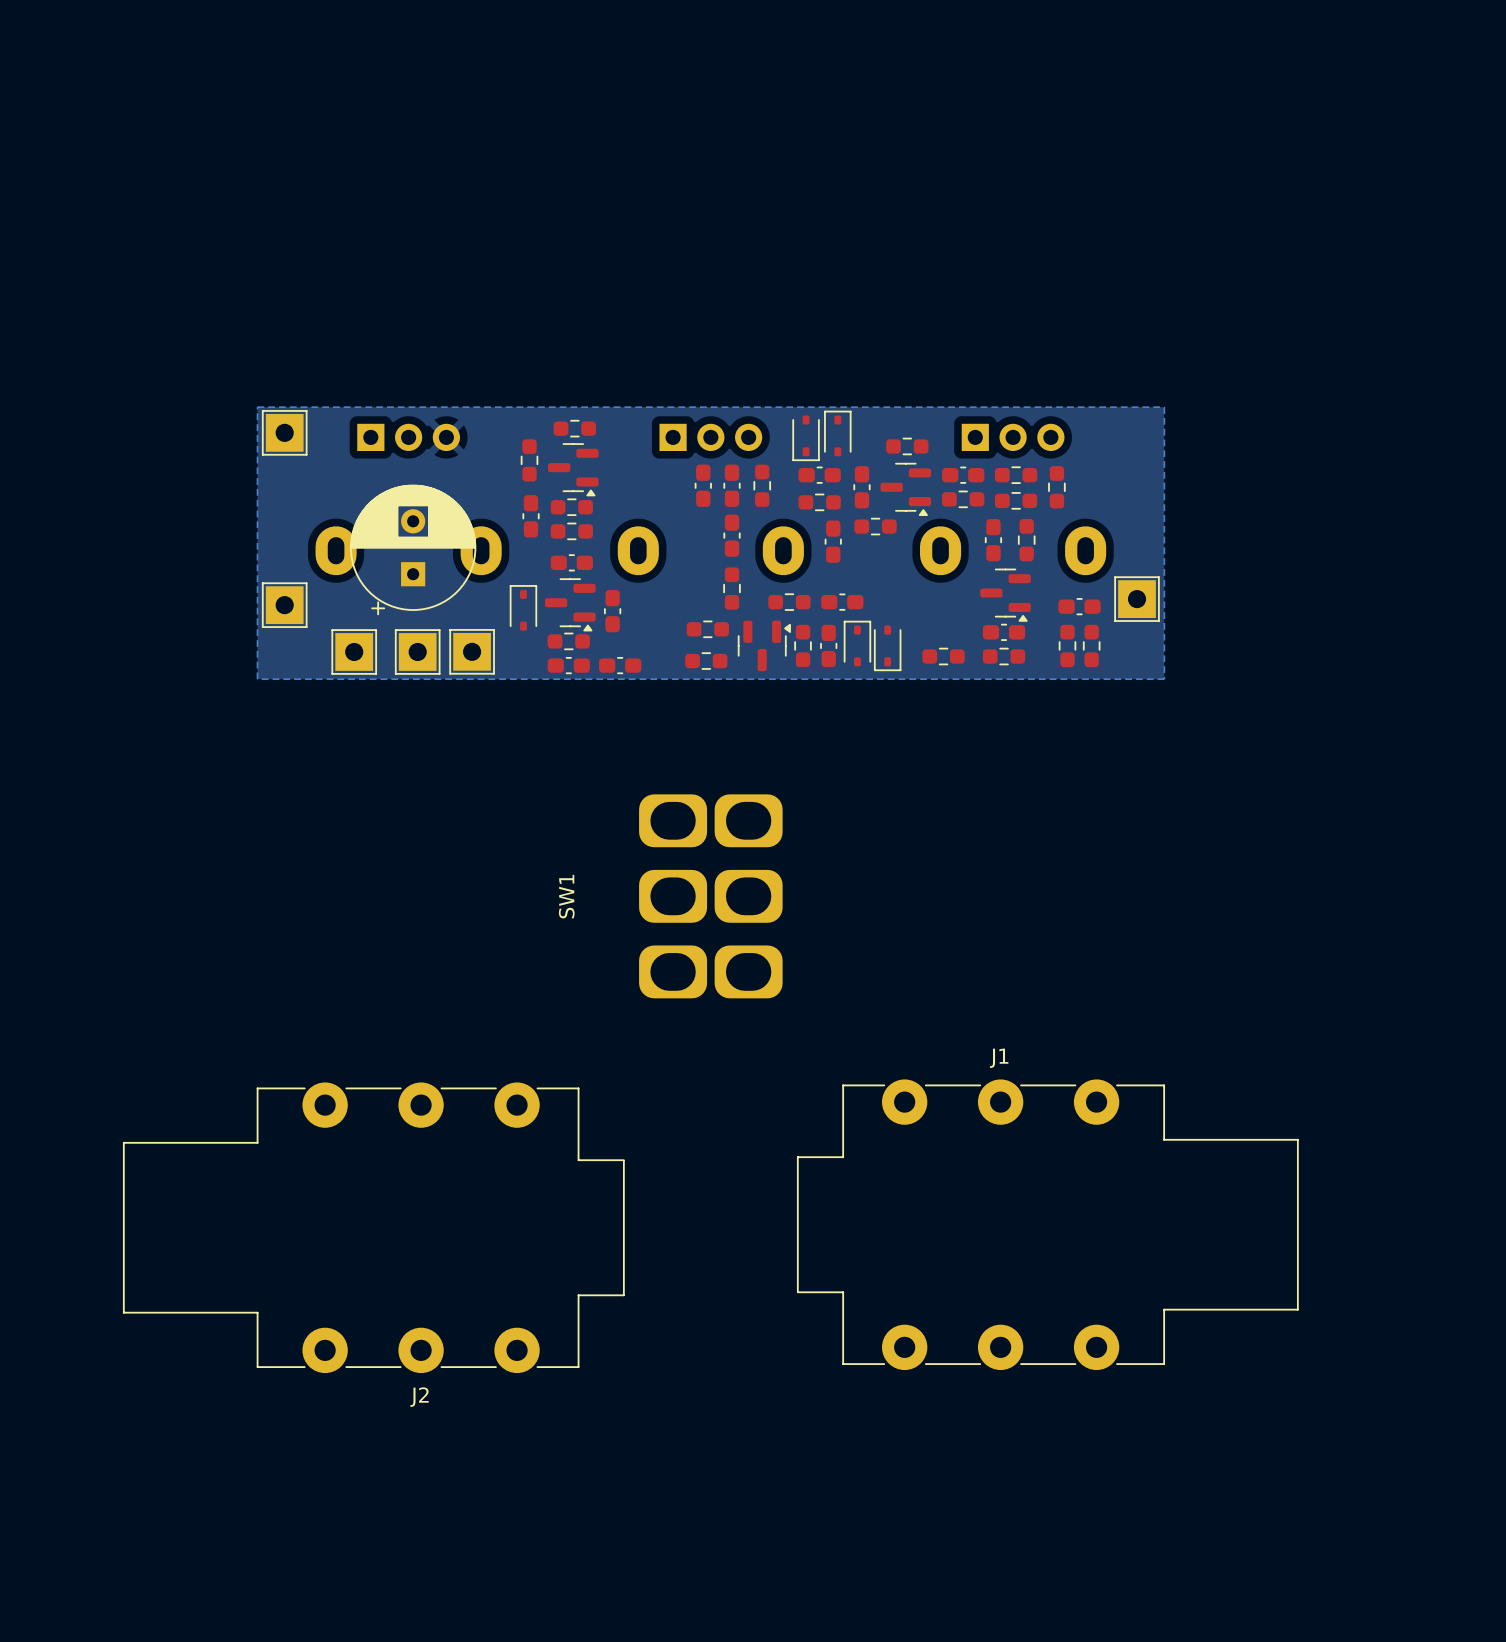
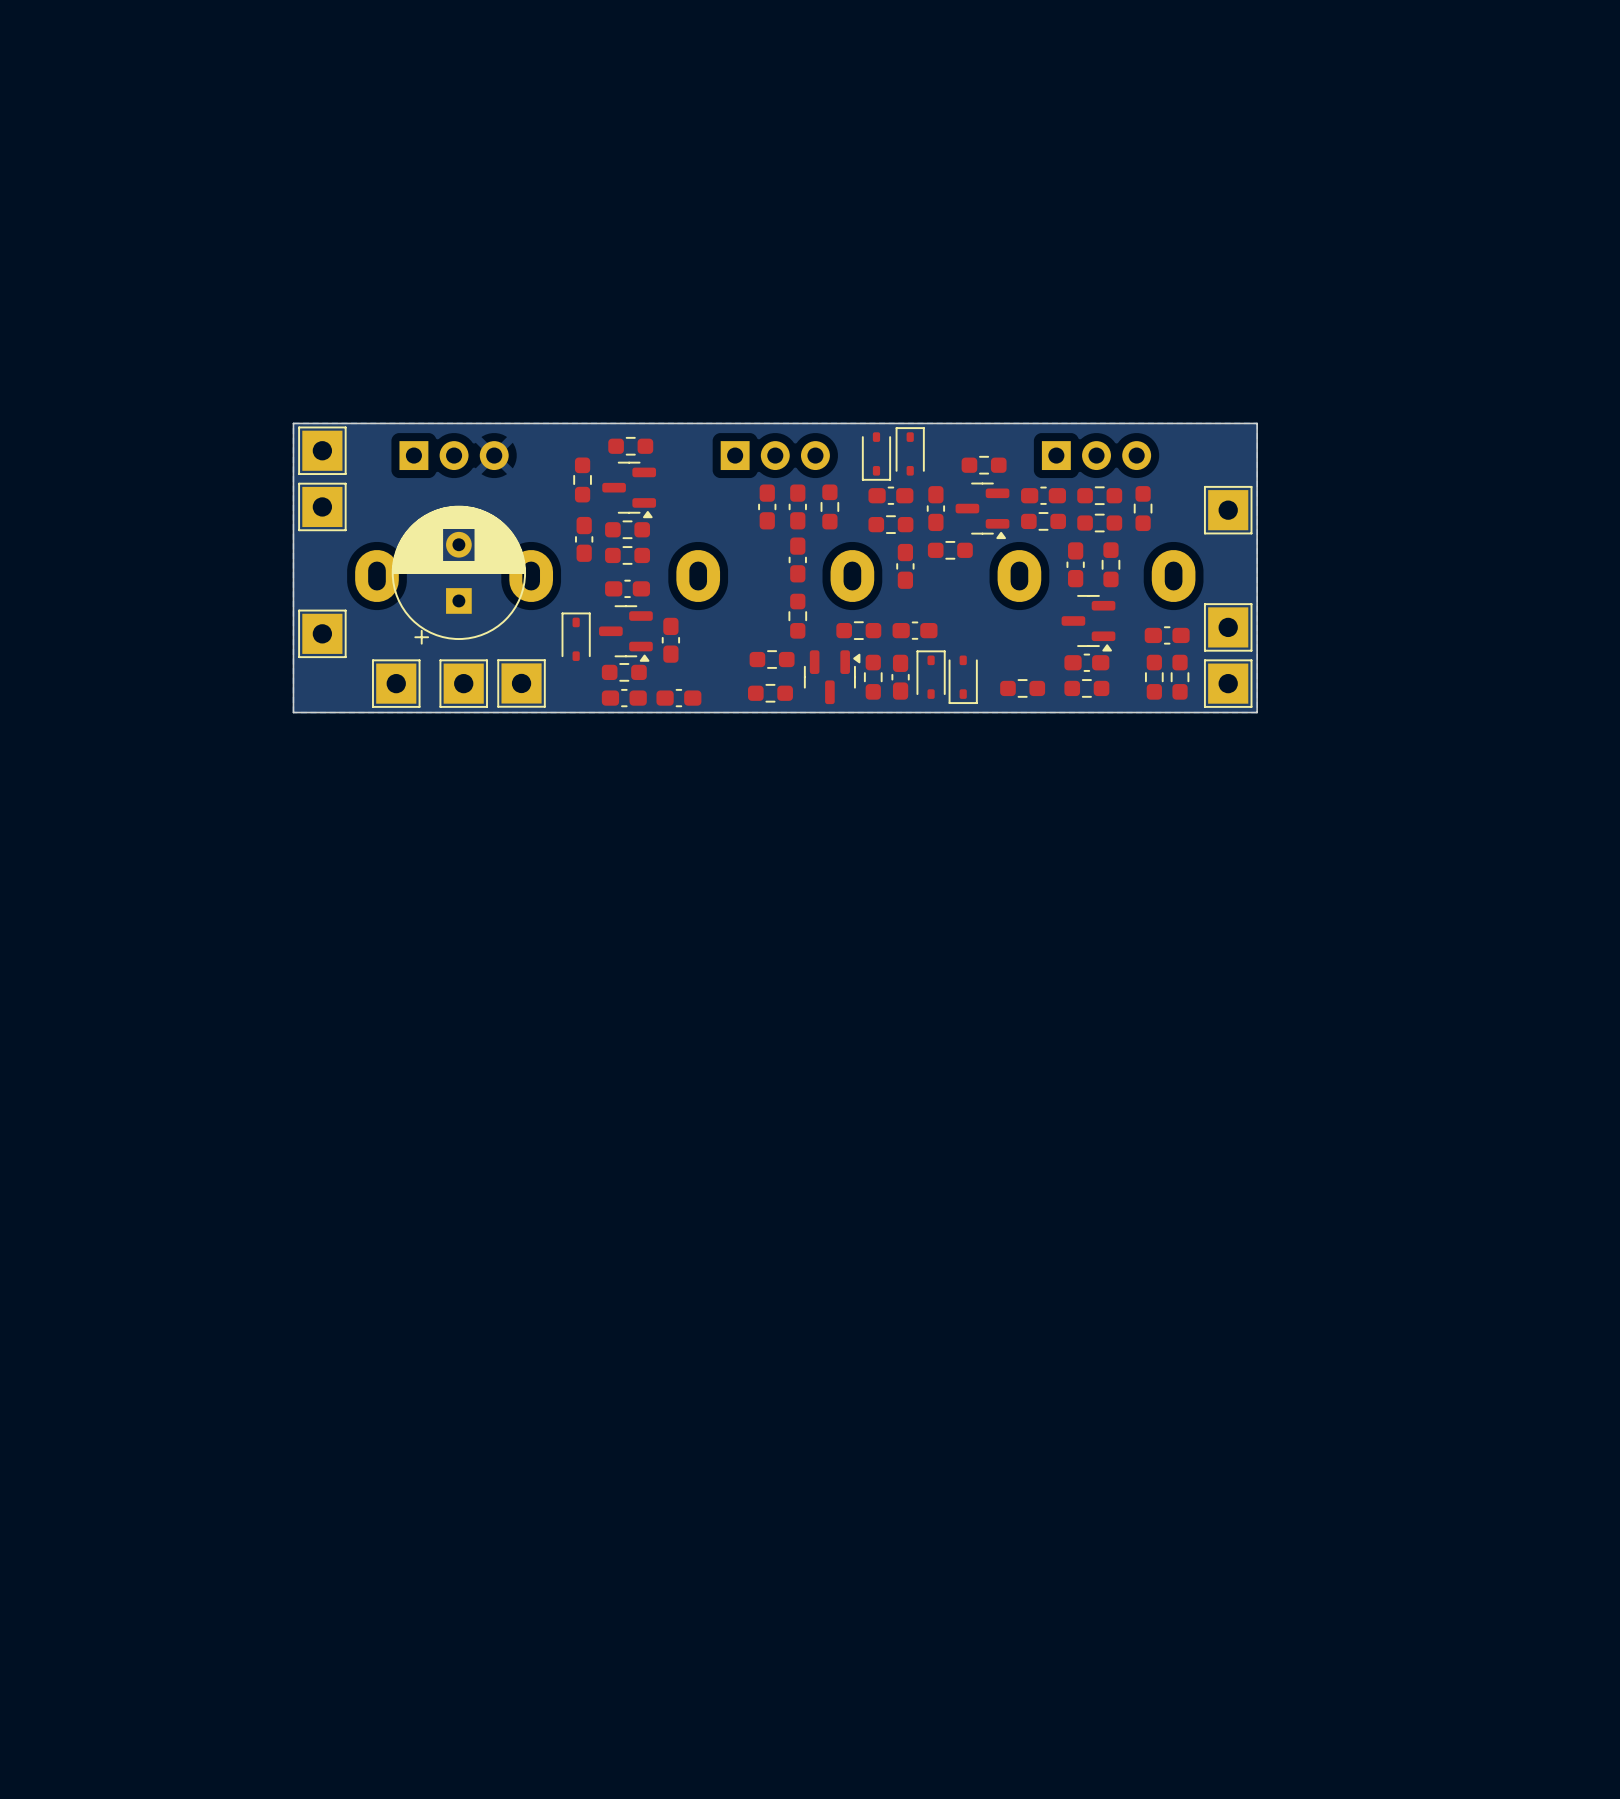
board edge: none -> (293, 423) (1257, 423) (1257, 712) (293, 712) (293, 423)
part: none -> (322, 506)
part: none -> (1228, 510)
part: none -> (1228, 683)
SW1: (710, 896) -> none
J1: (1047, 1224) -> none
J2: (373, 1227) -> none

